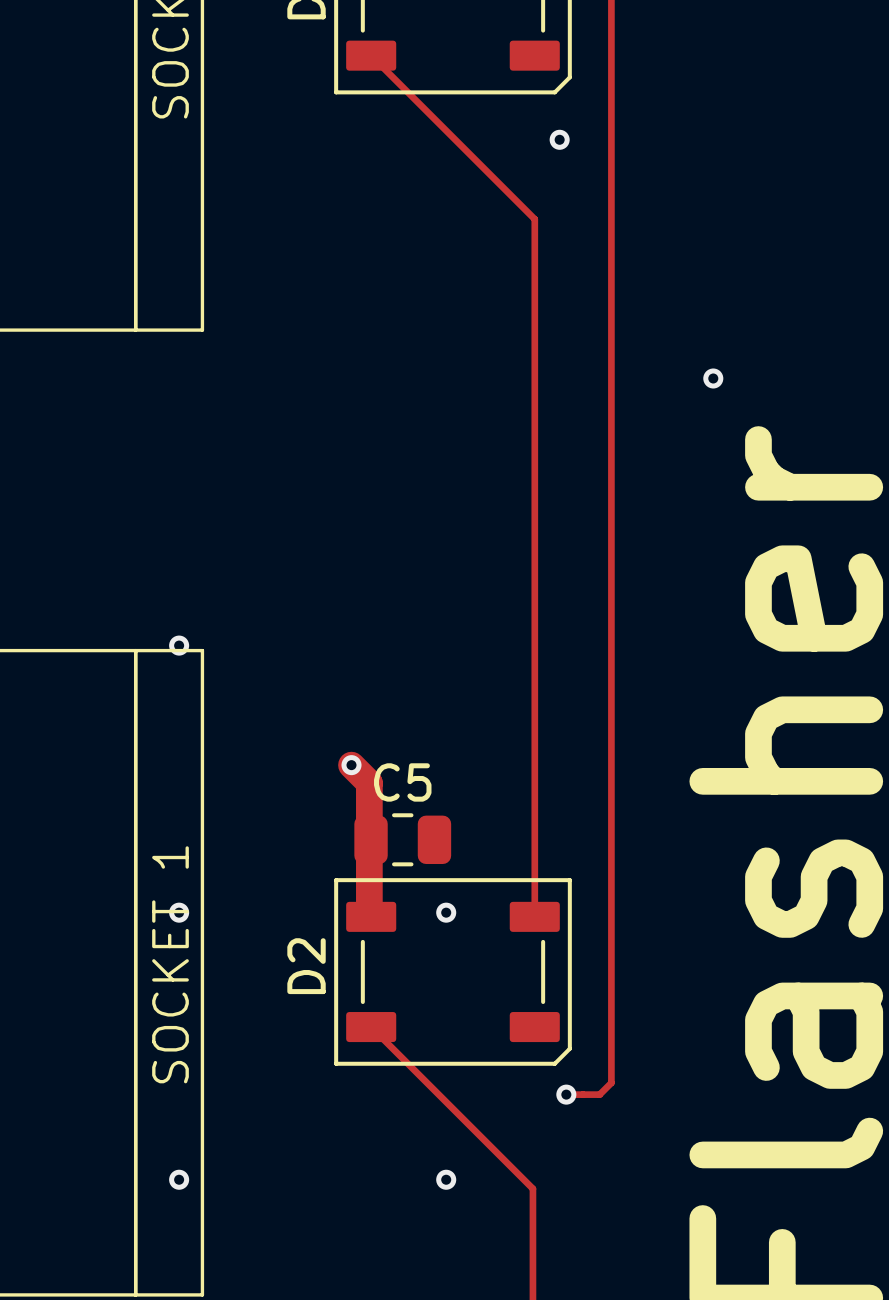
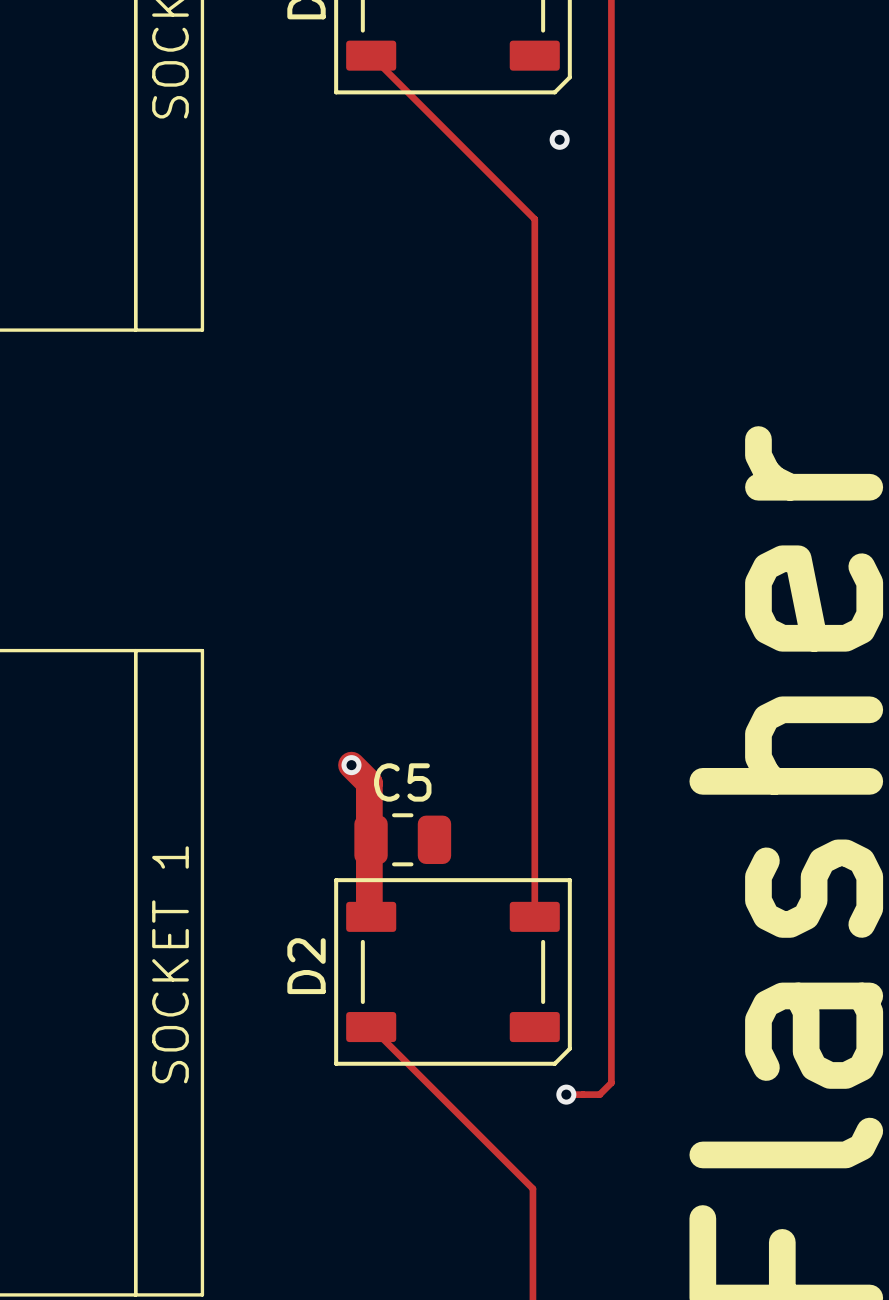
via: (713, 378) -> none
via: (179, 645) -> none
via: (179, 912) -> none
via: (446, 912) -> none
via: (179, 1179) -> none
via: (446, 1179) -> none

